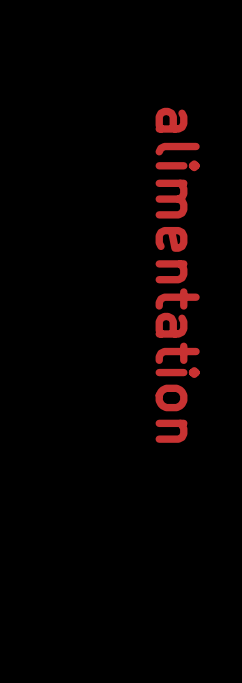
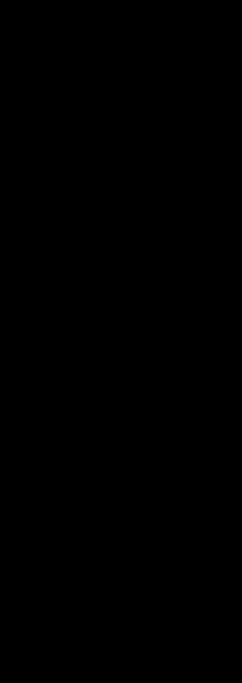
text: alimentation (177, 275) -> none

